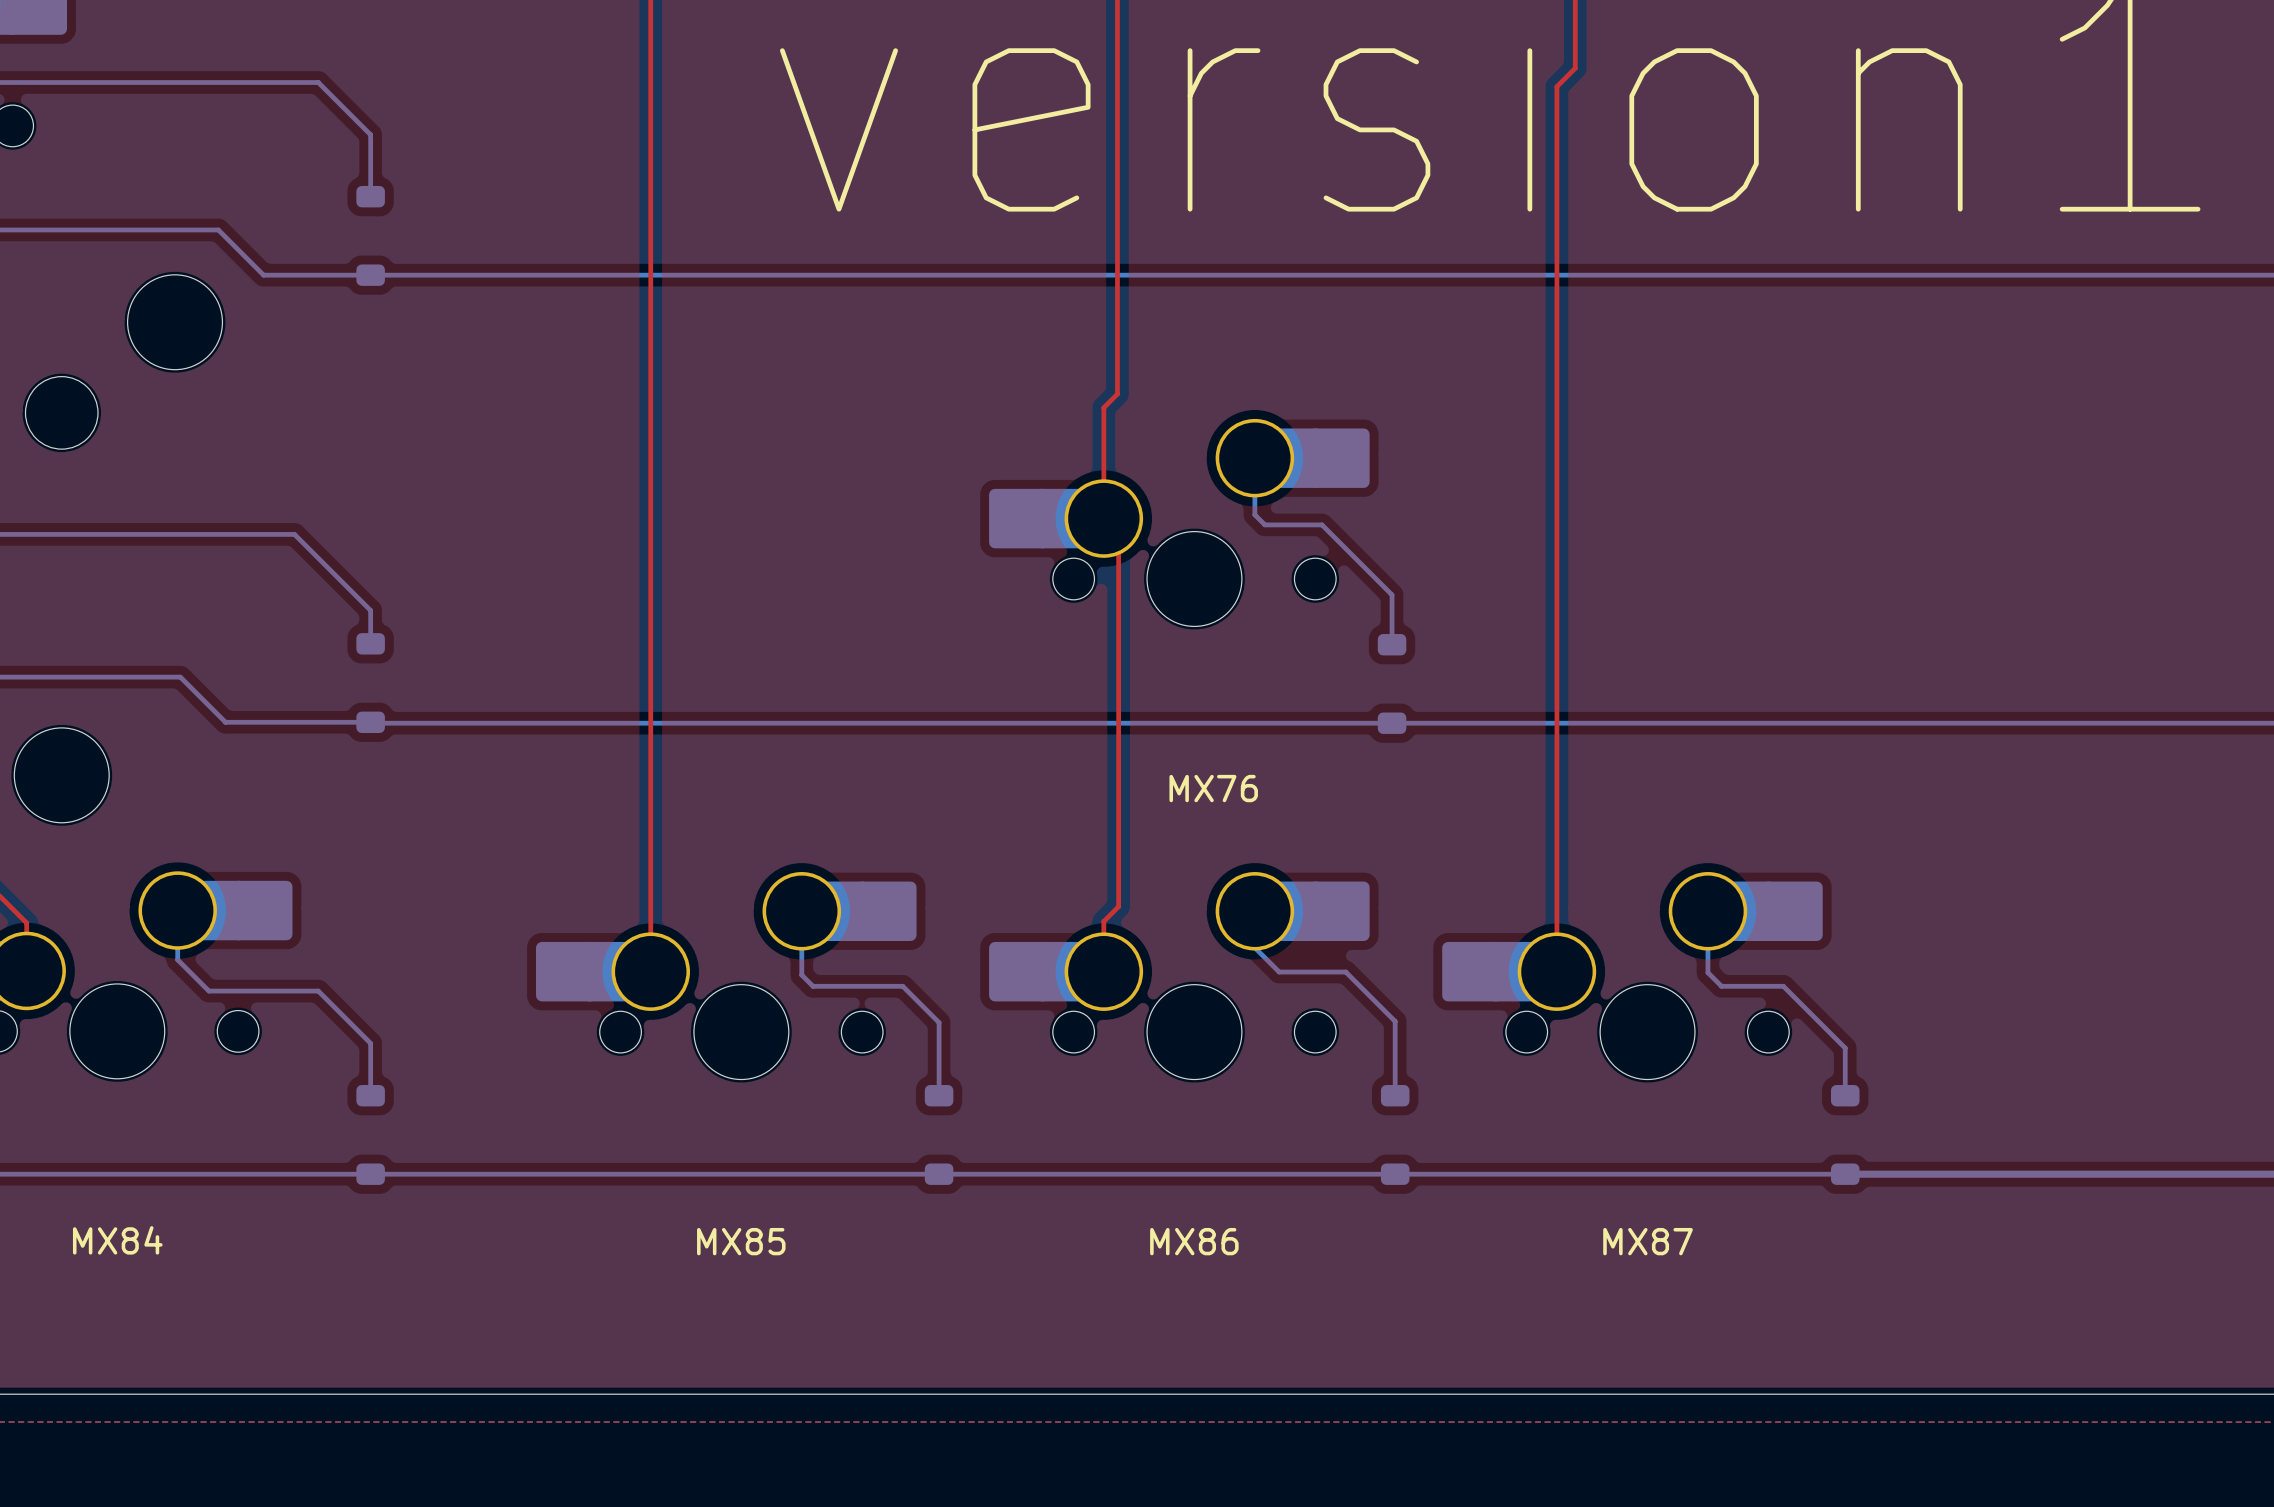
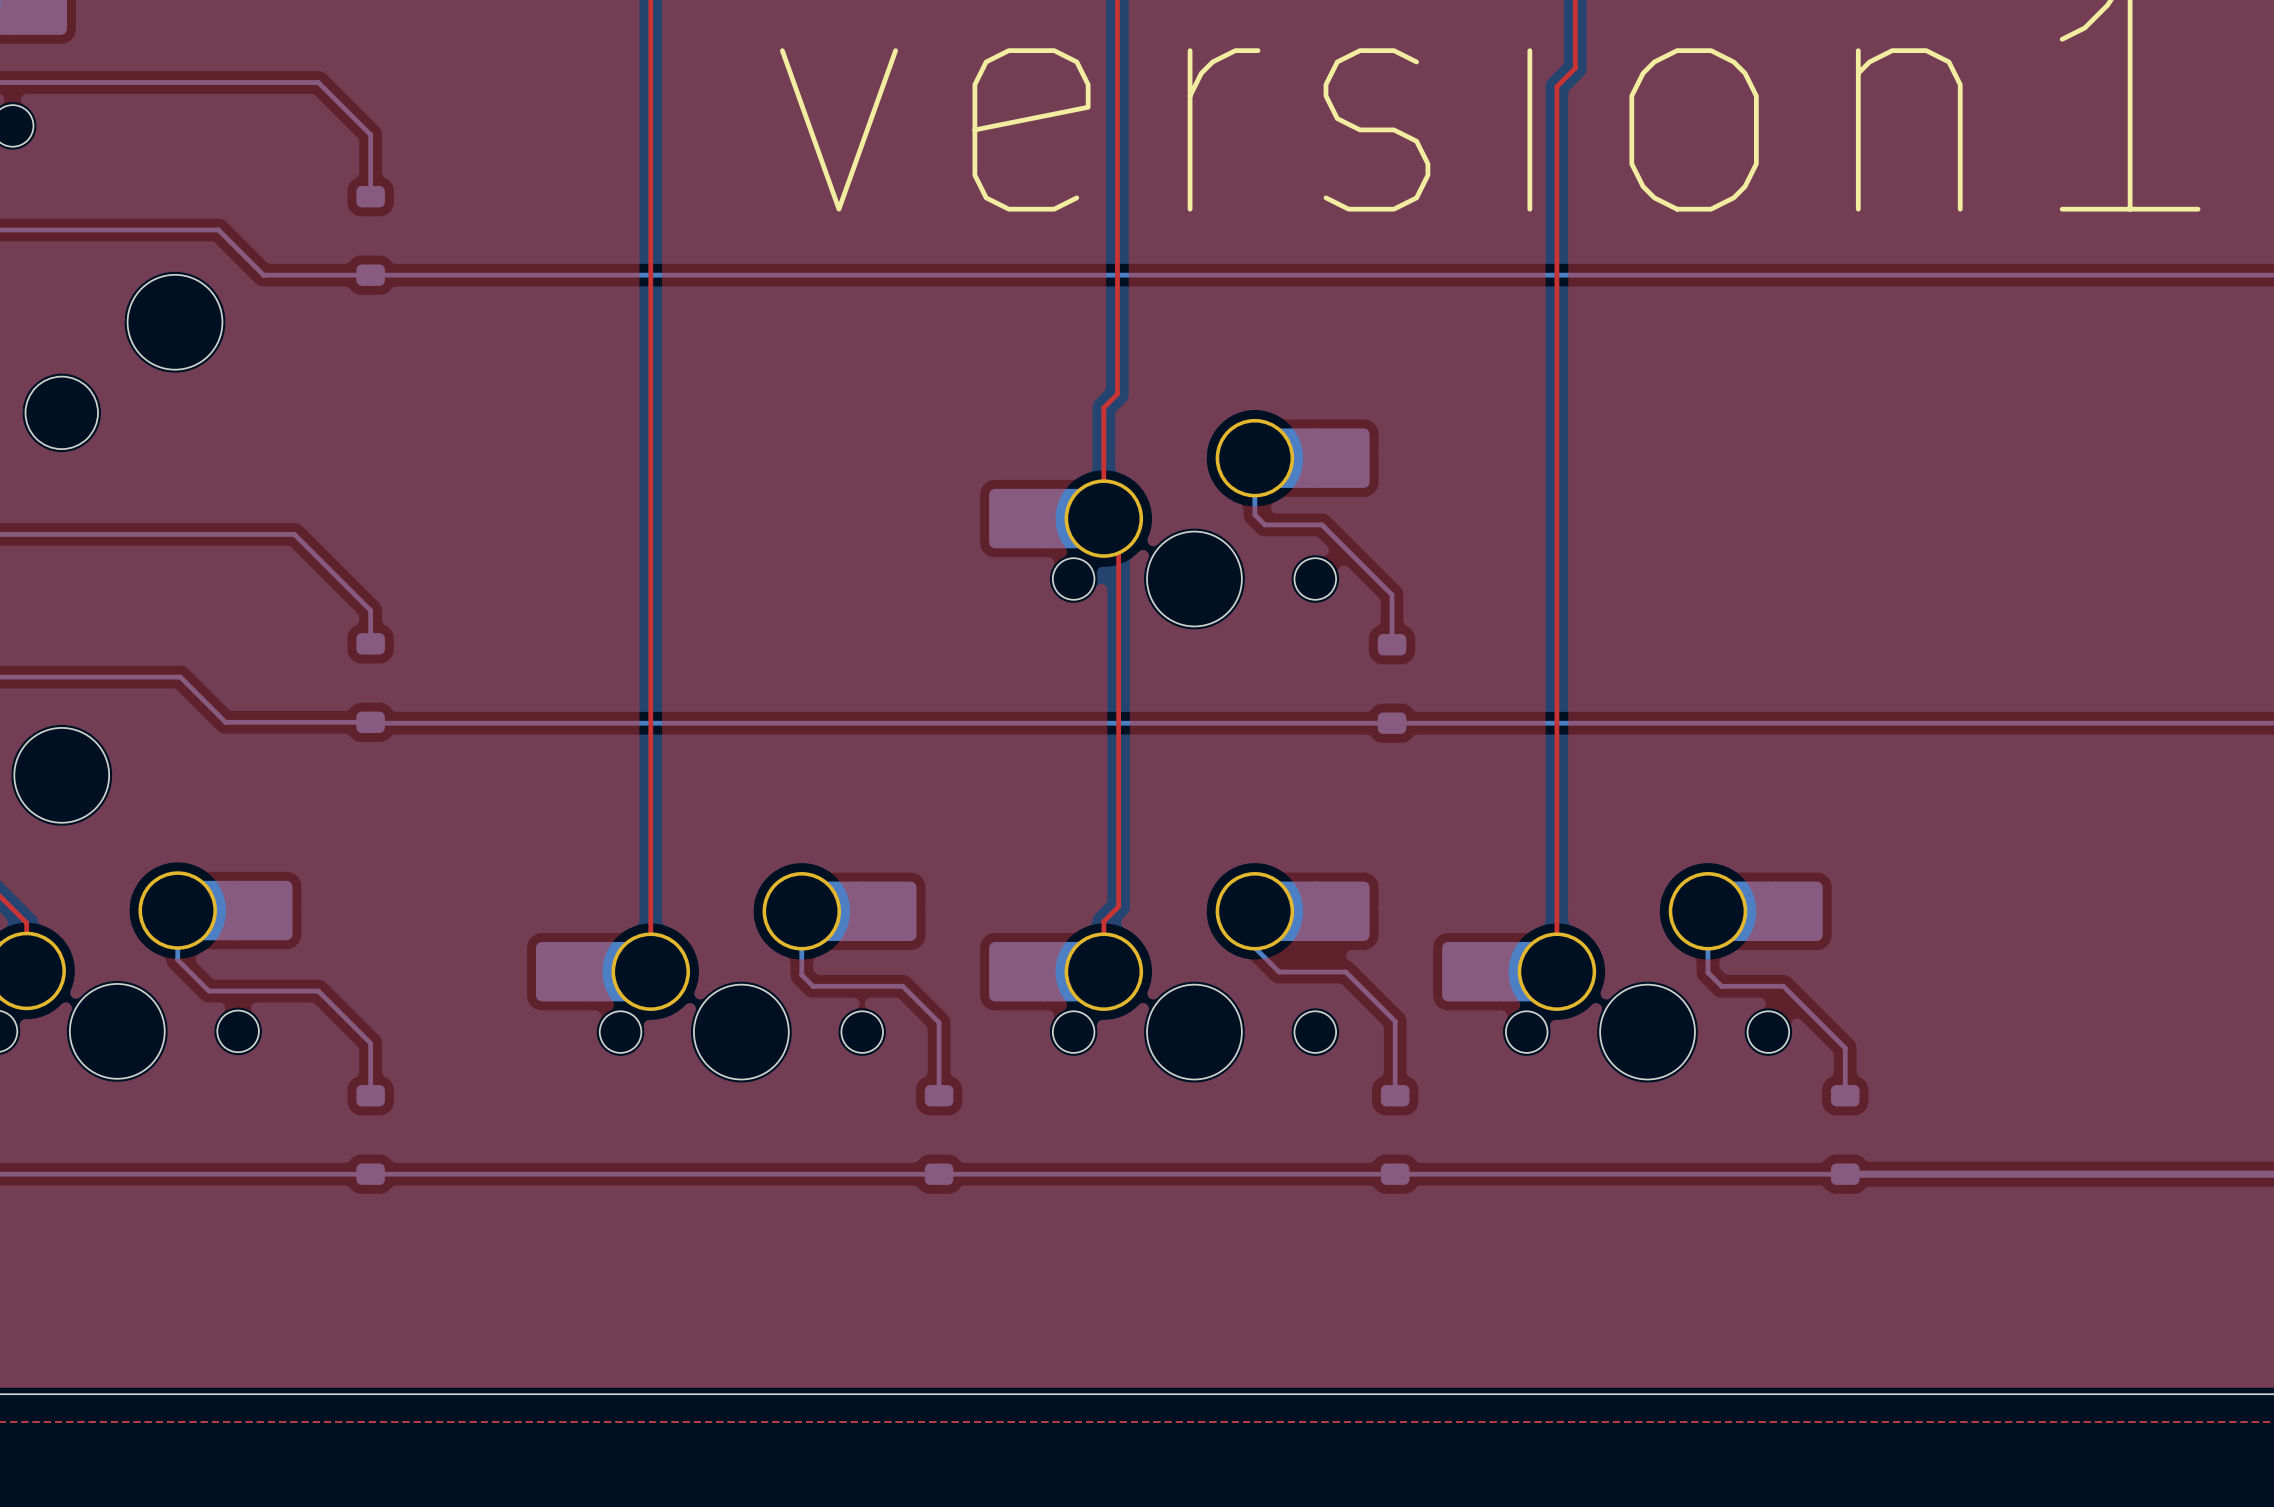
MX76 name: MX76 (1213, 788) -> none
MX84 name: MX84 (117, 1240) -> none
MX85 name: MX85 (741, 1241) -> none
MX86 name: MX86 (1194, 1241) -> none
MX87 name: MX87 (1648, 1241) -> none

